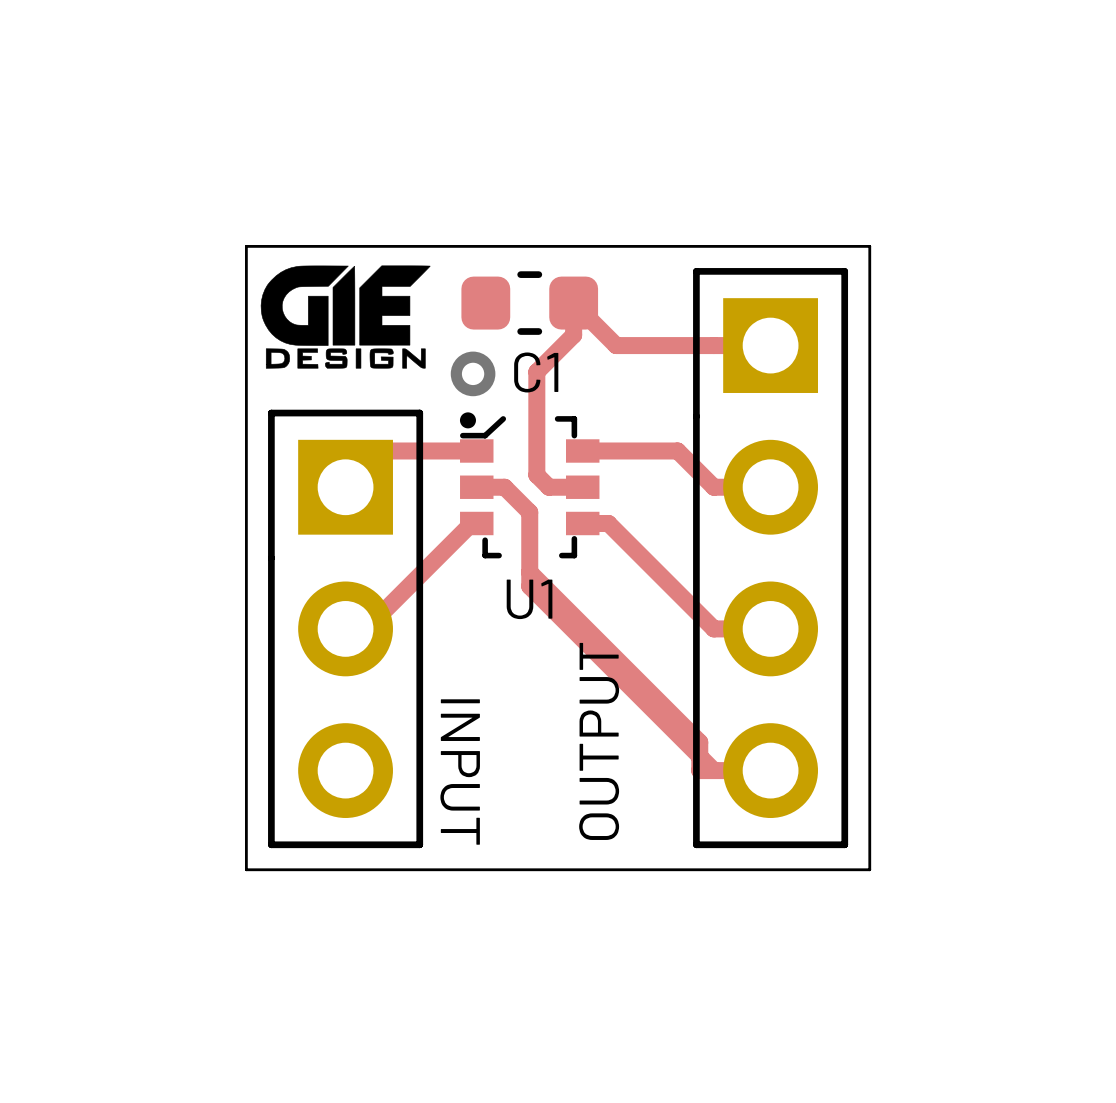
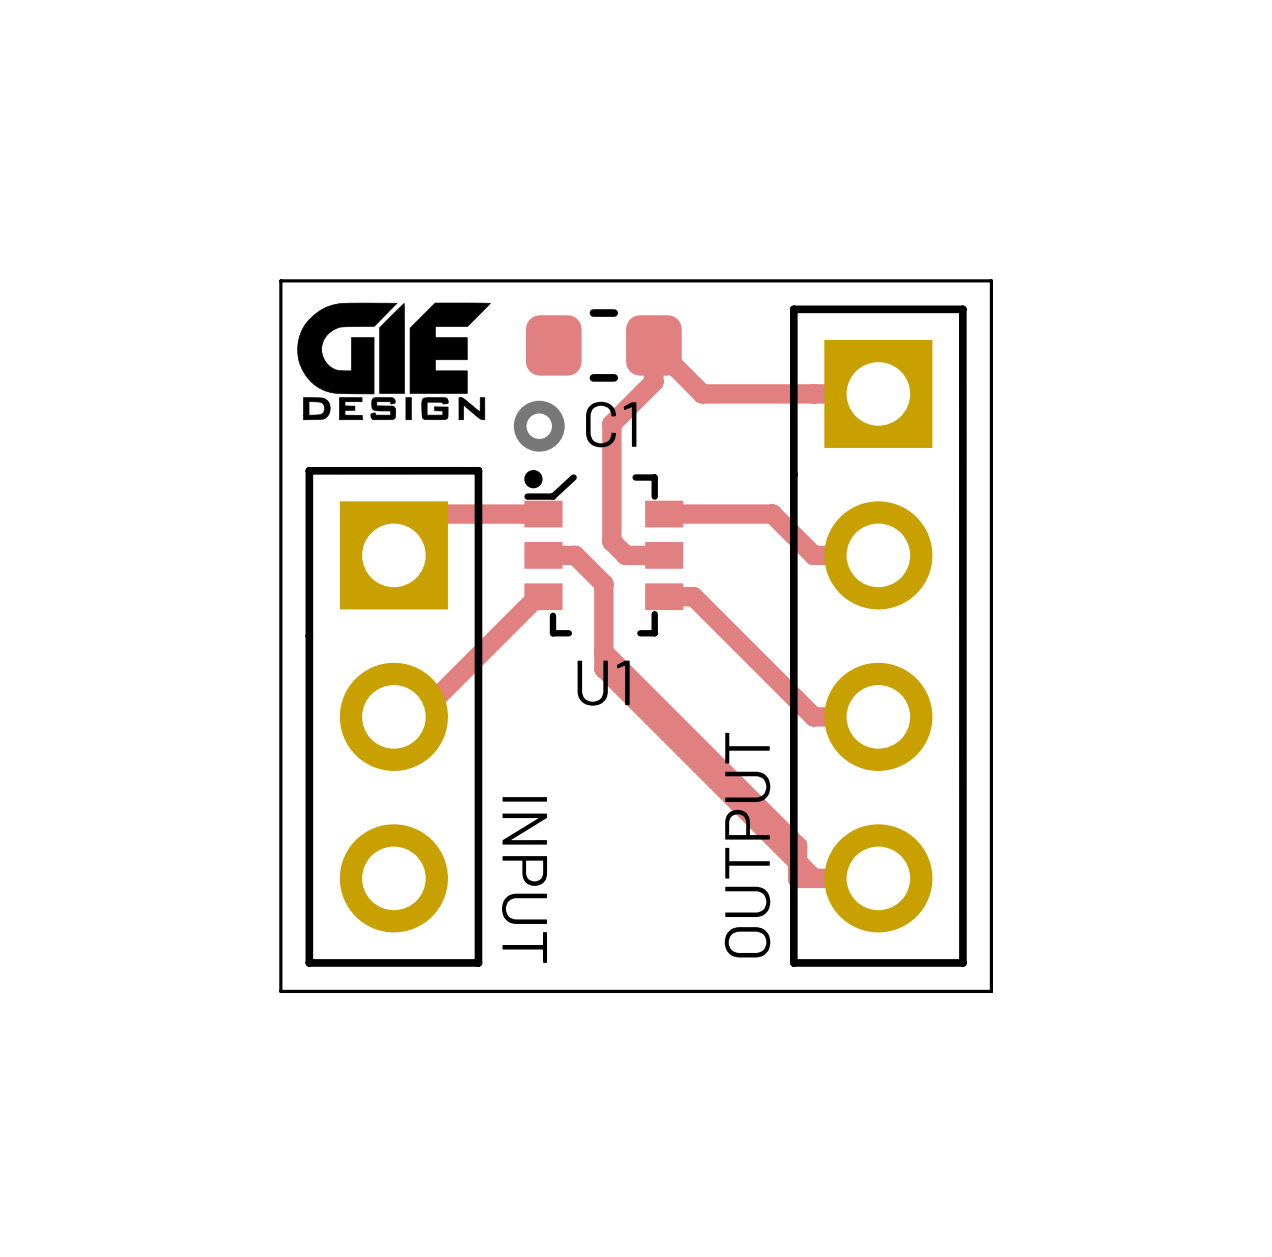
text position: OUTPUT (599, 741) -> OUTPUT (747, 845)

